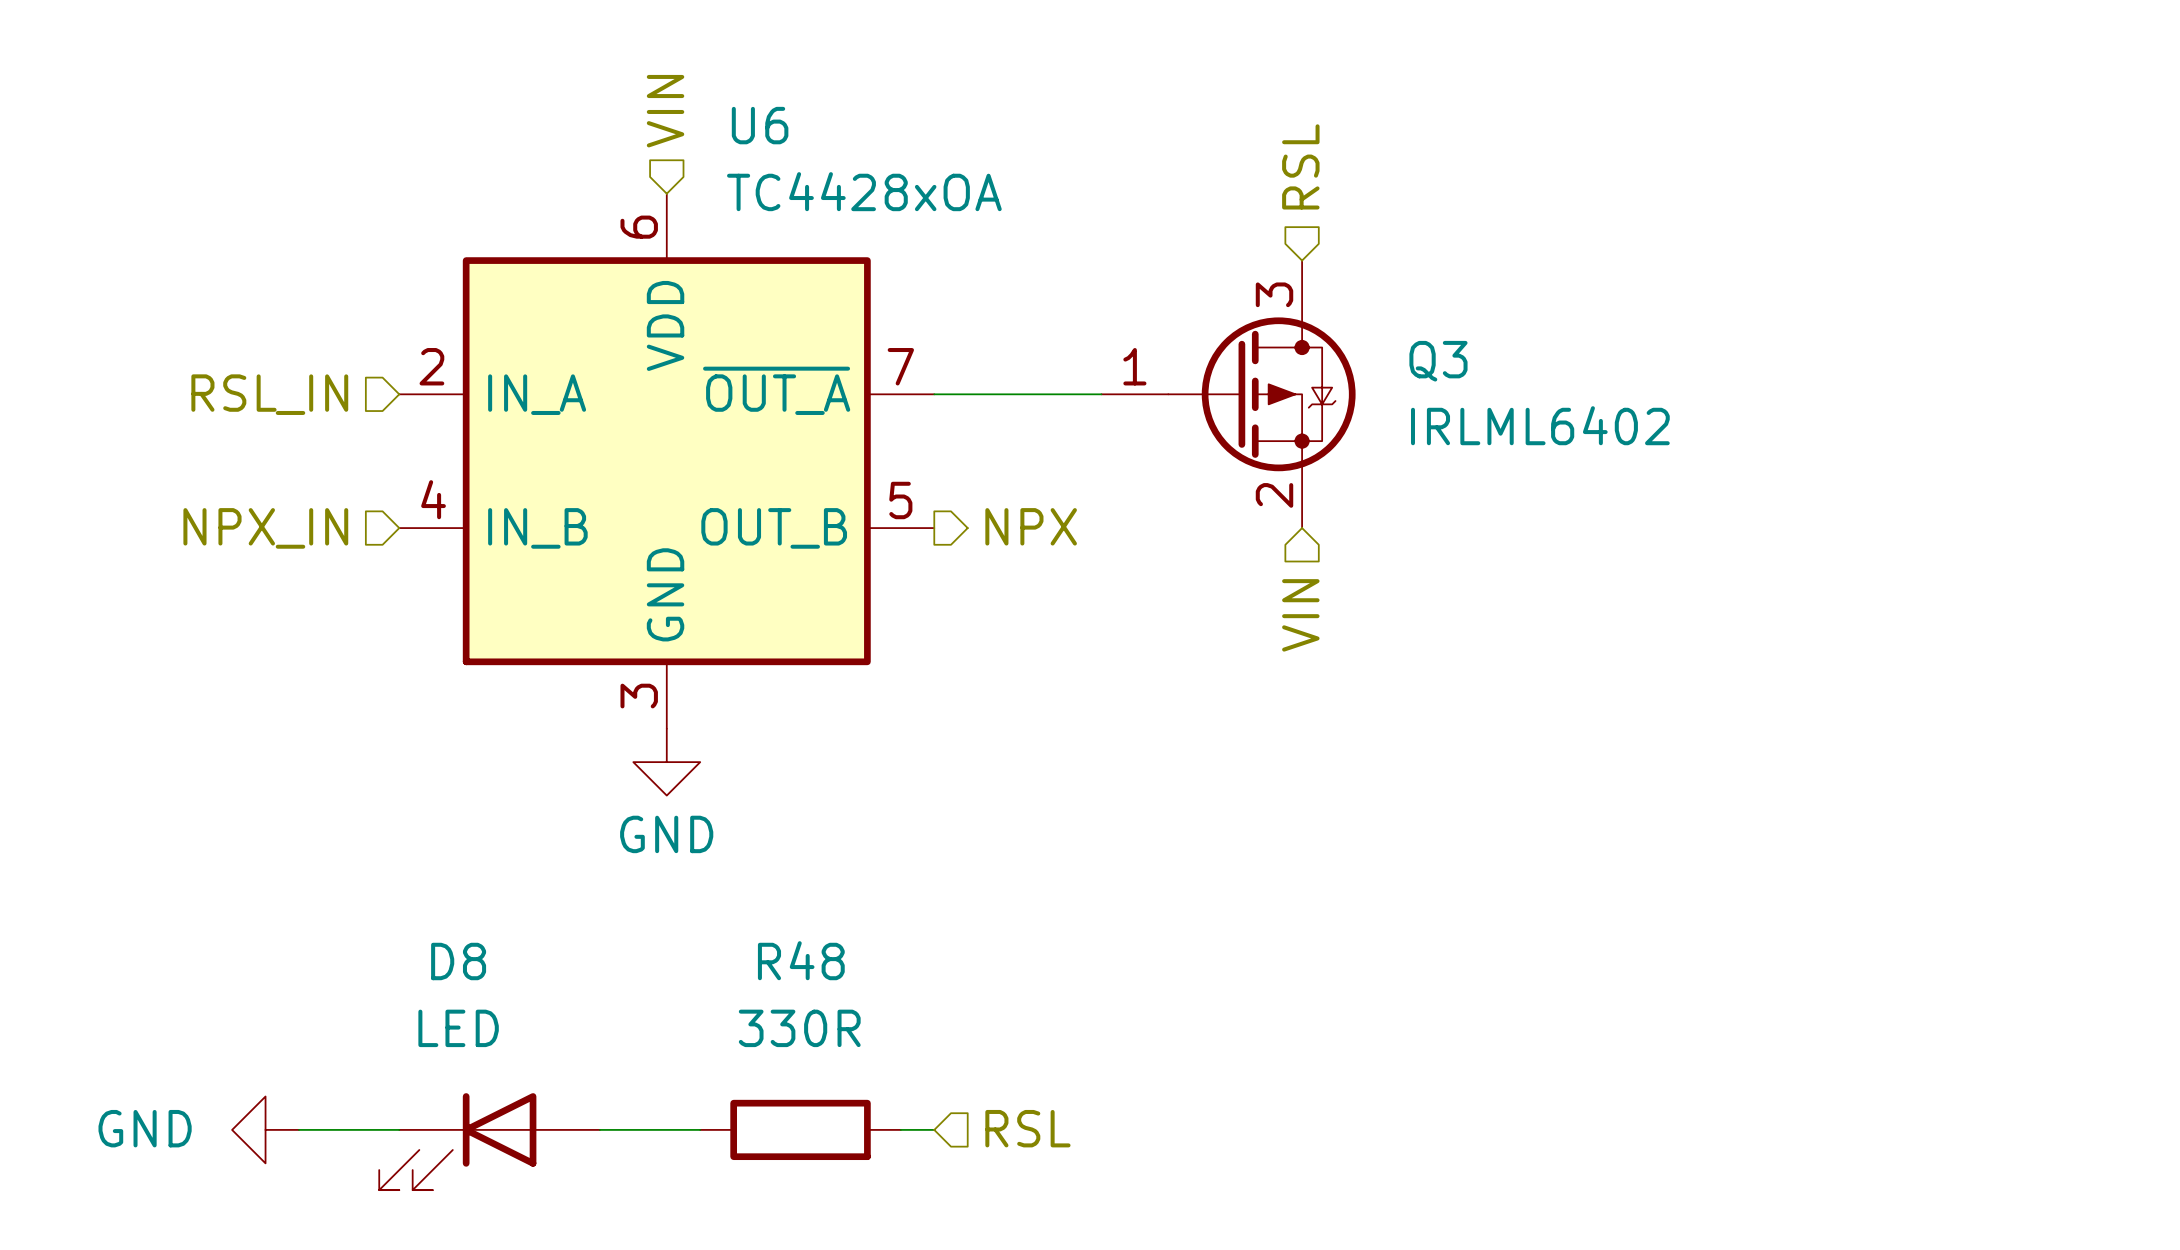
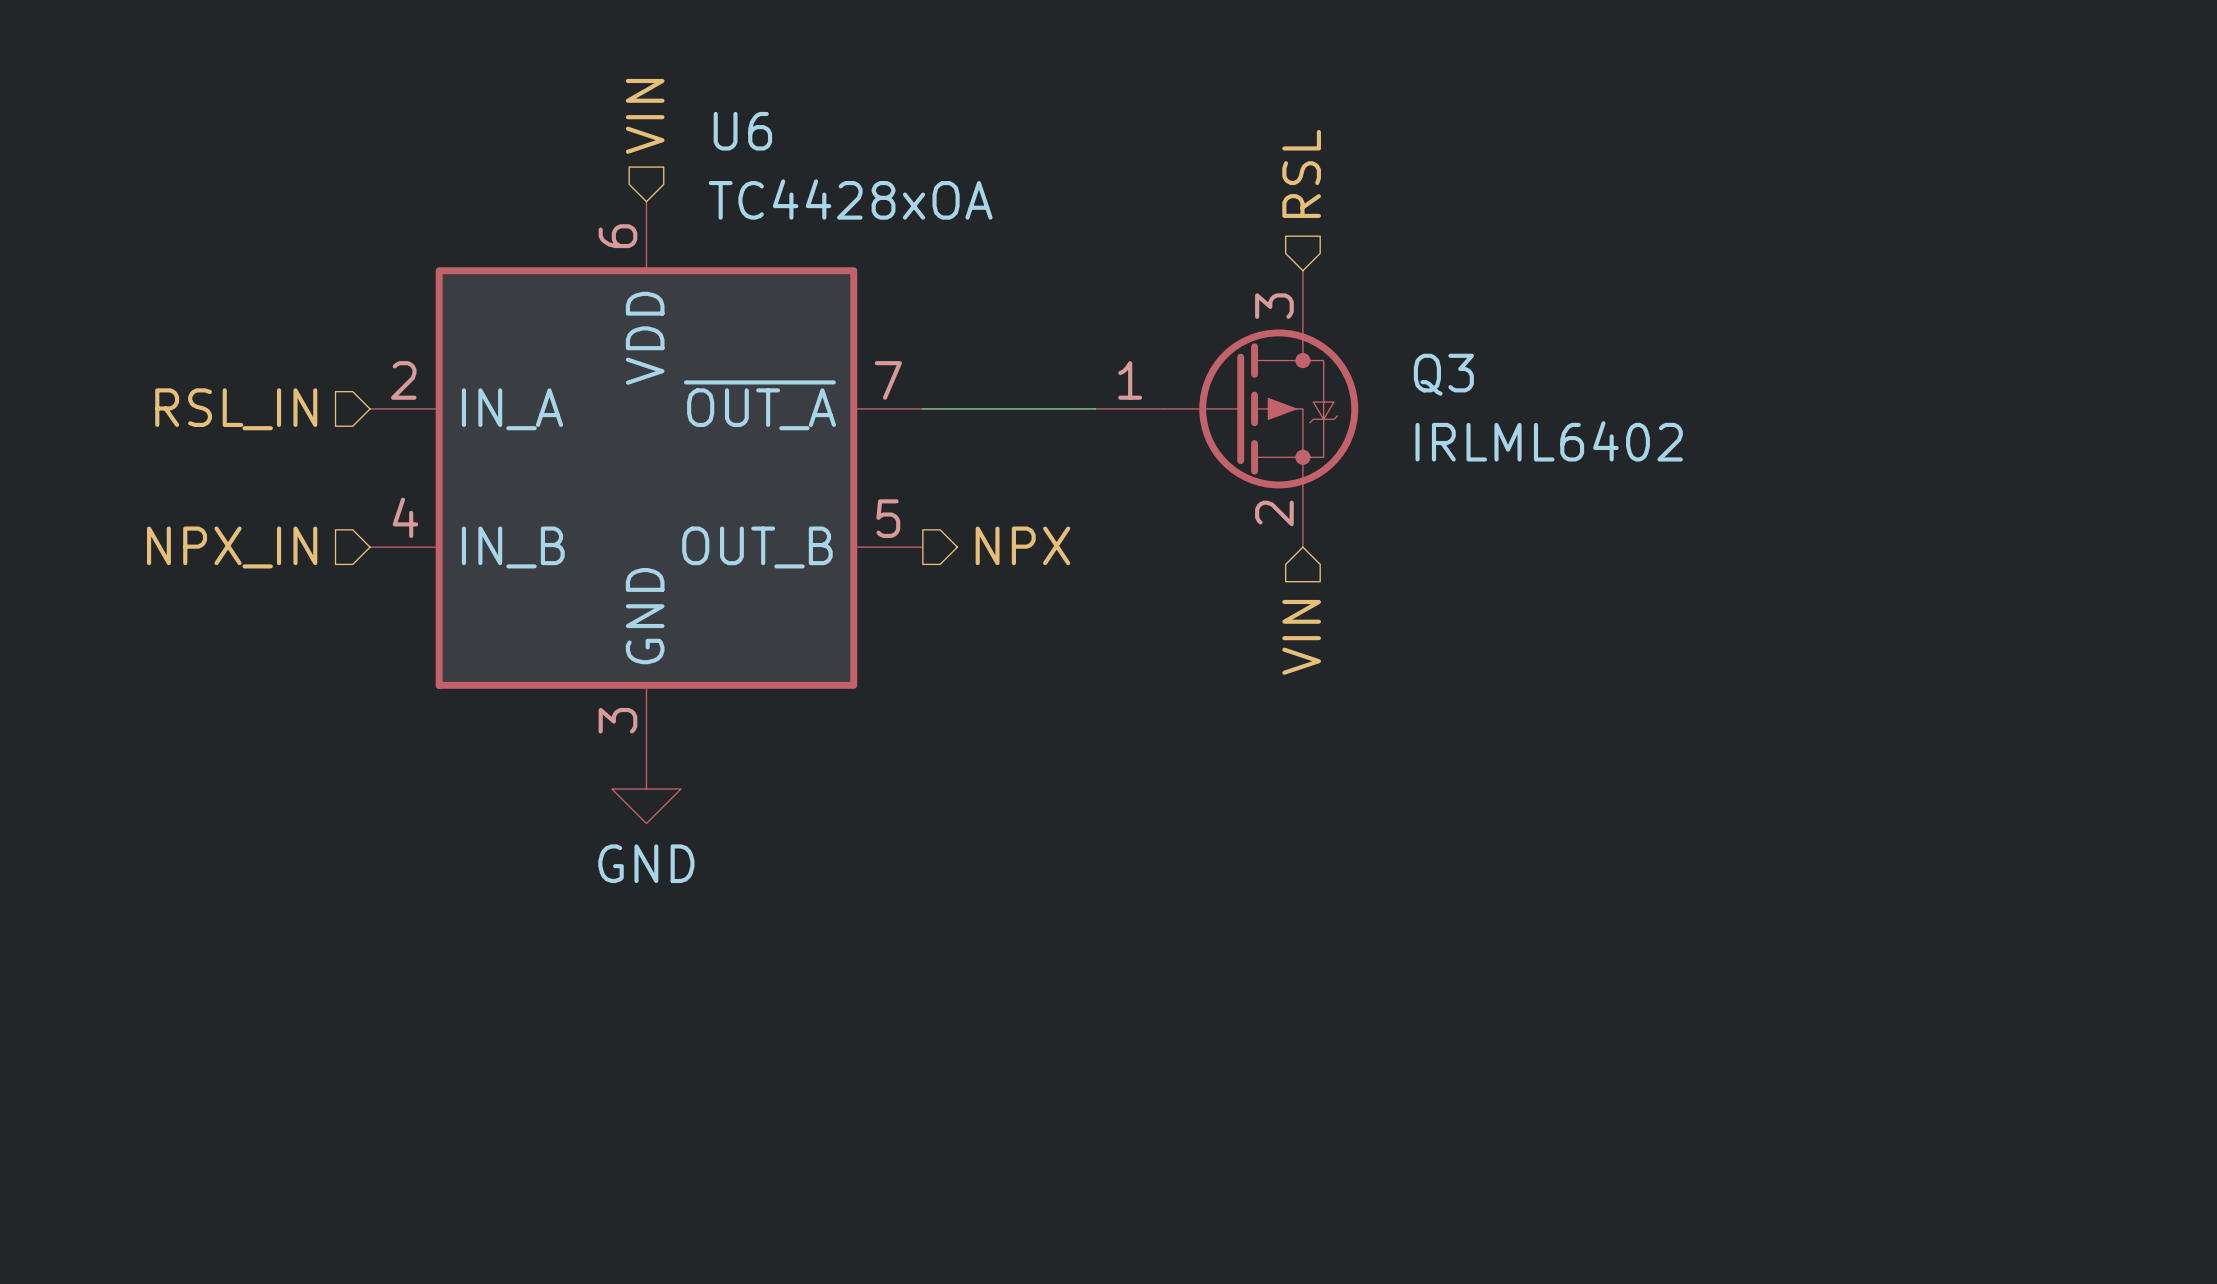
hierarchical label: RSL (1027, 1128) -> none
power symbol: GND (265, 1129) -> none
wire: (298, 1129) (399, 1129) -> none
wire: (599, 1129) (700, 1129) -> none
R48: 330R (800, 1129) -> none
wire: (900, 1129) (934, 1129) -> none
D8: LED (489, 1141) -> none

